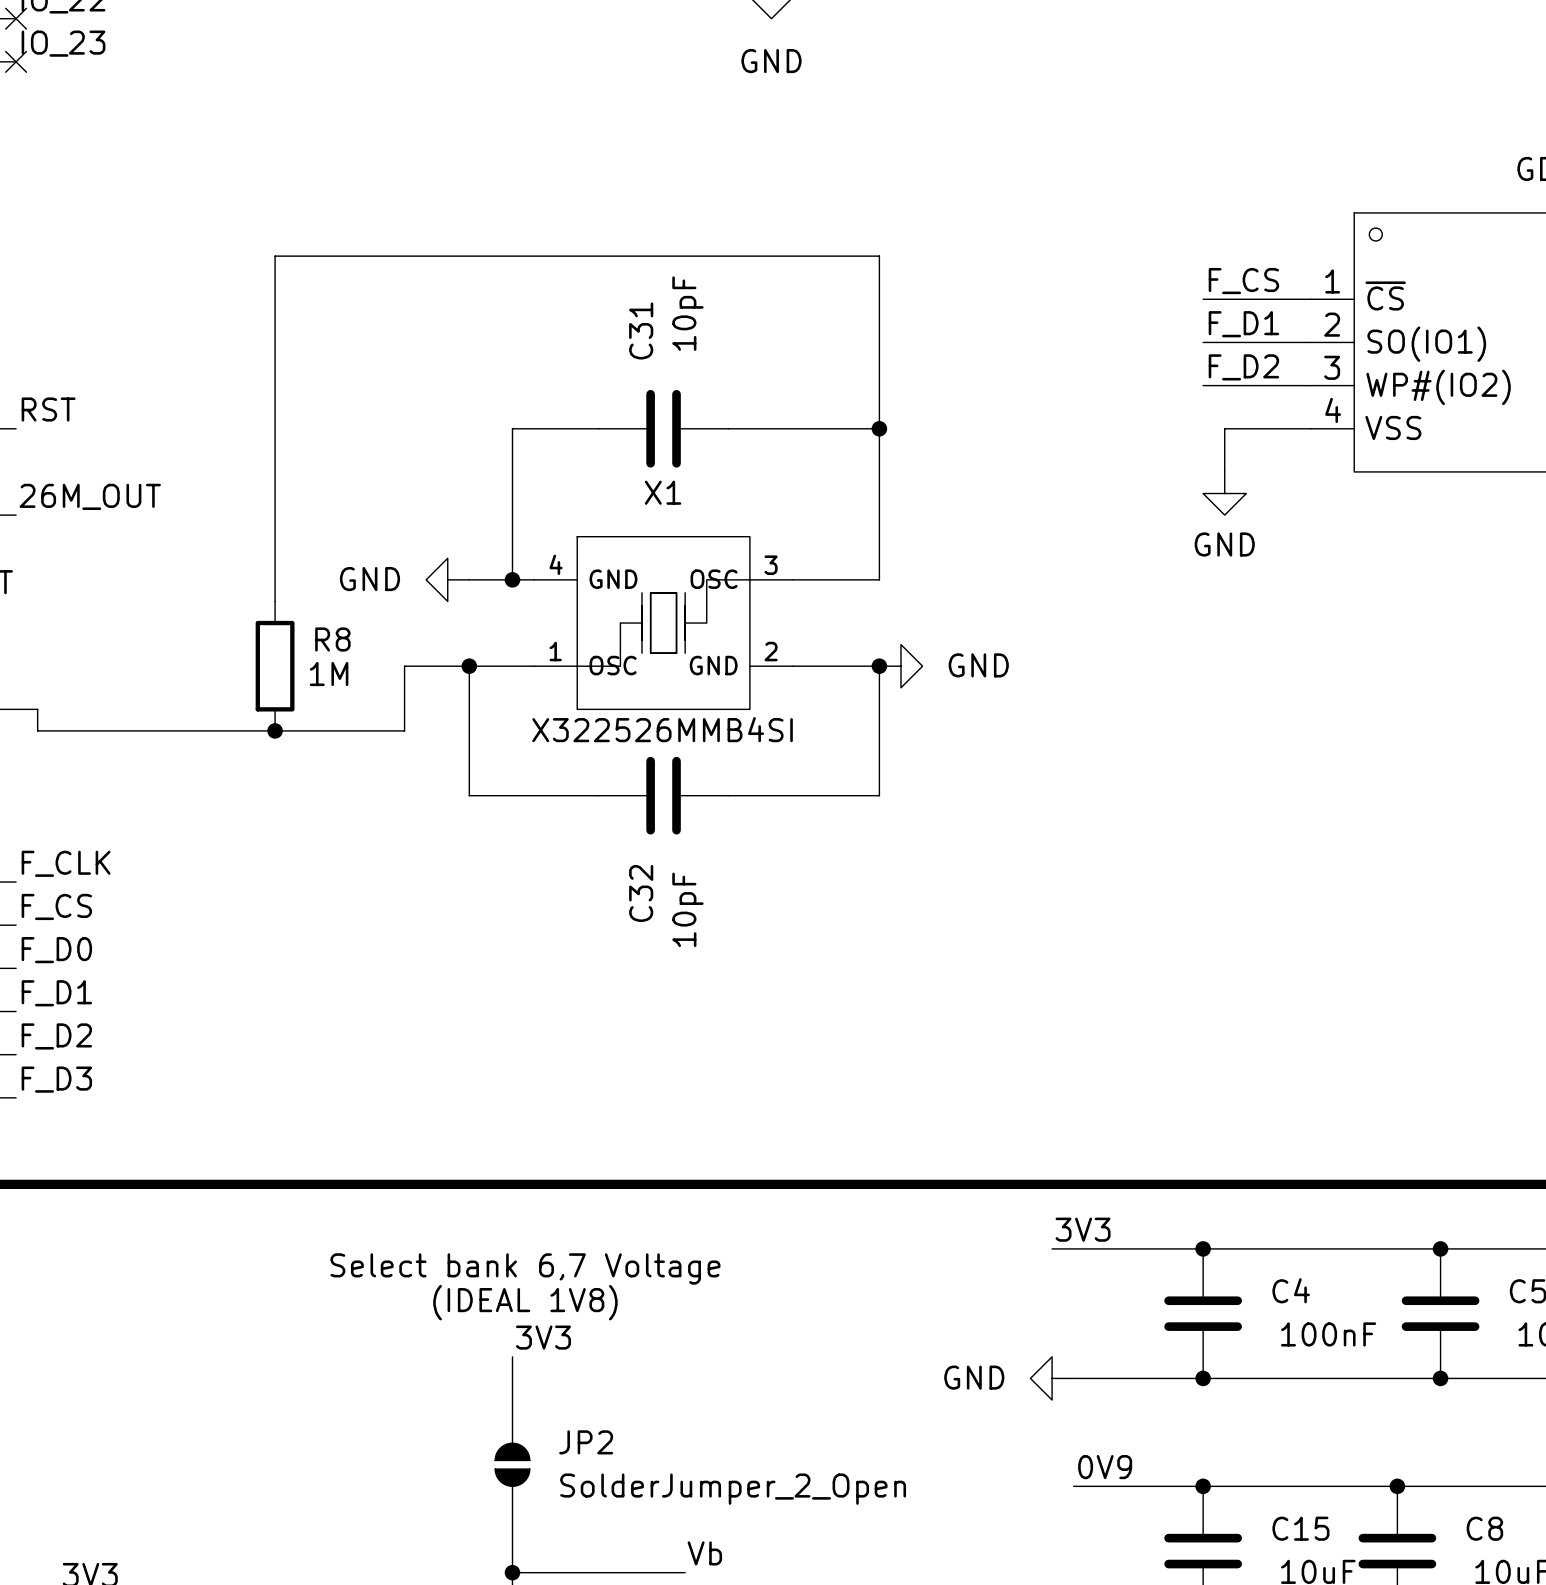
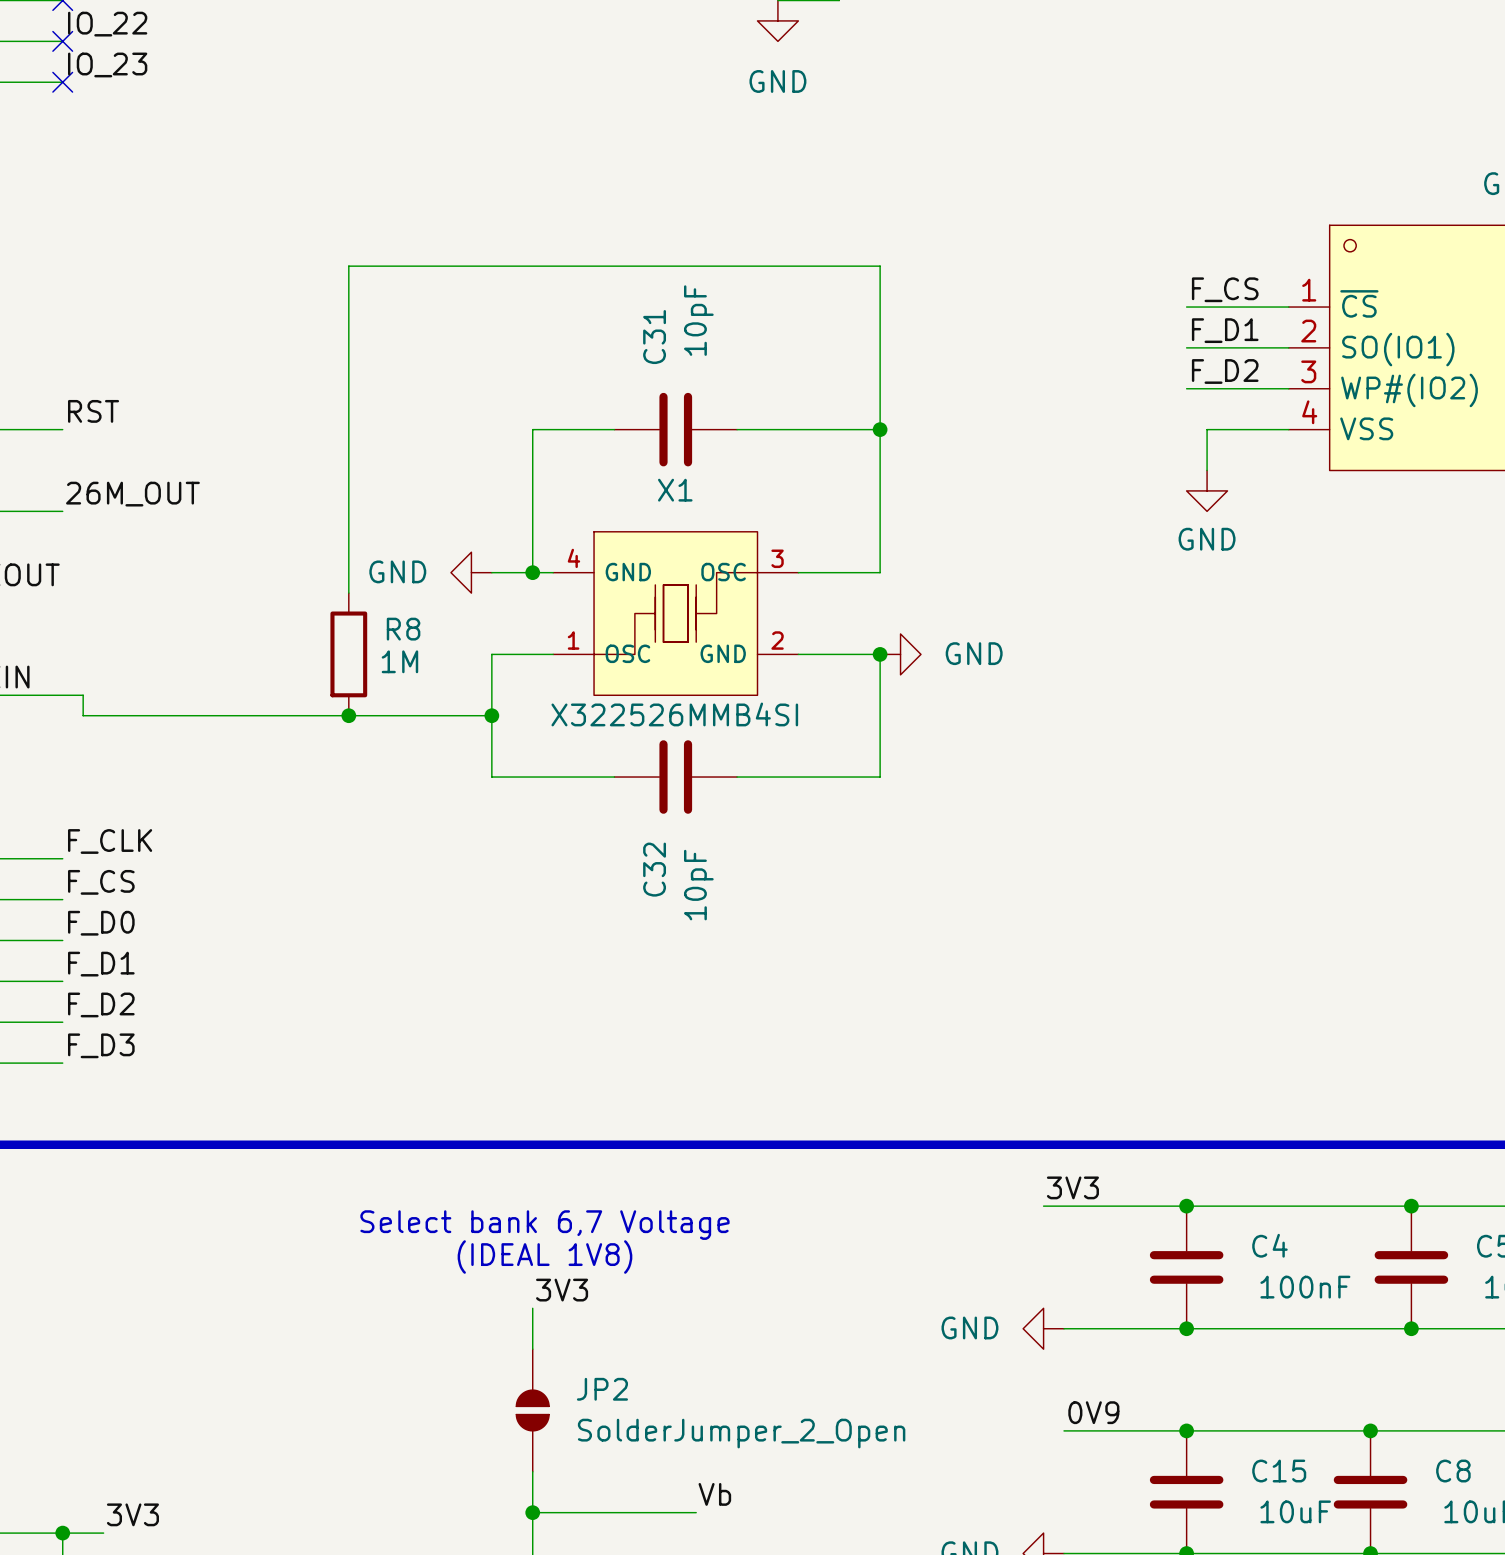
wire: (318, 256) (275, 256) (275, 601) -> (348, 266) (348, 593)
R8 position: (275, 666) -> (348, 654)
wire: (469, 666) (404, 666) (404, 730) -> (491, 715) (430, 715)
junction position: (469, 666) -> (491, 715)
junction position: (275, 730) -> (348, 715)

